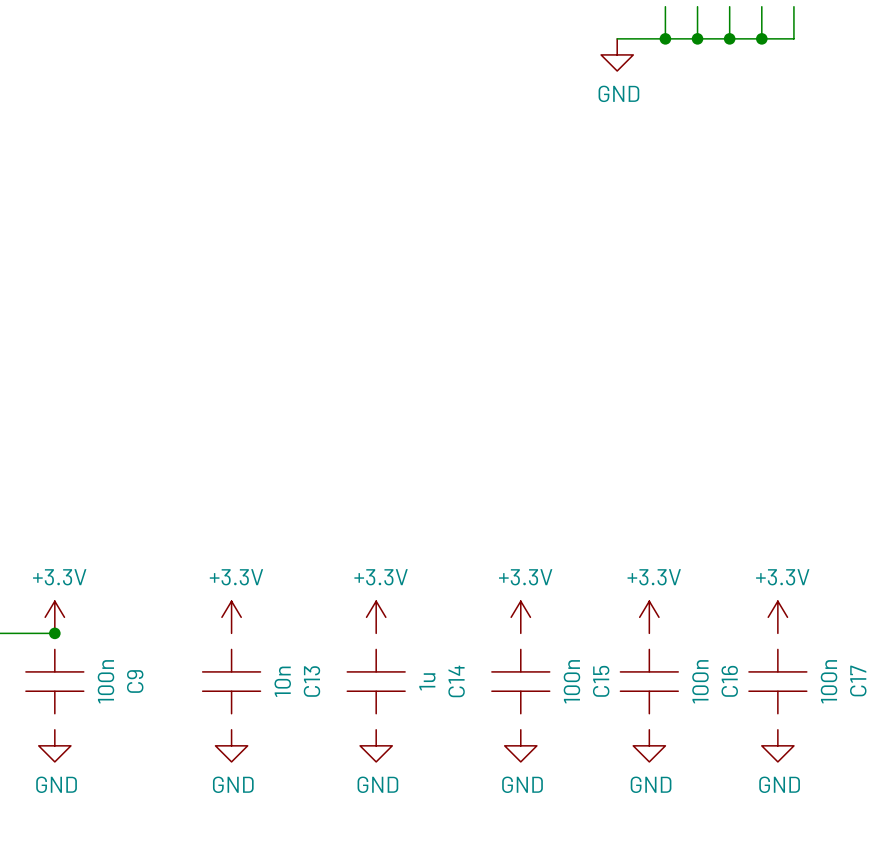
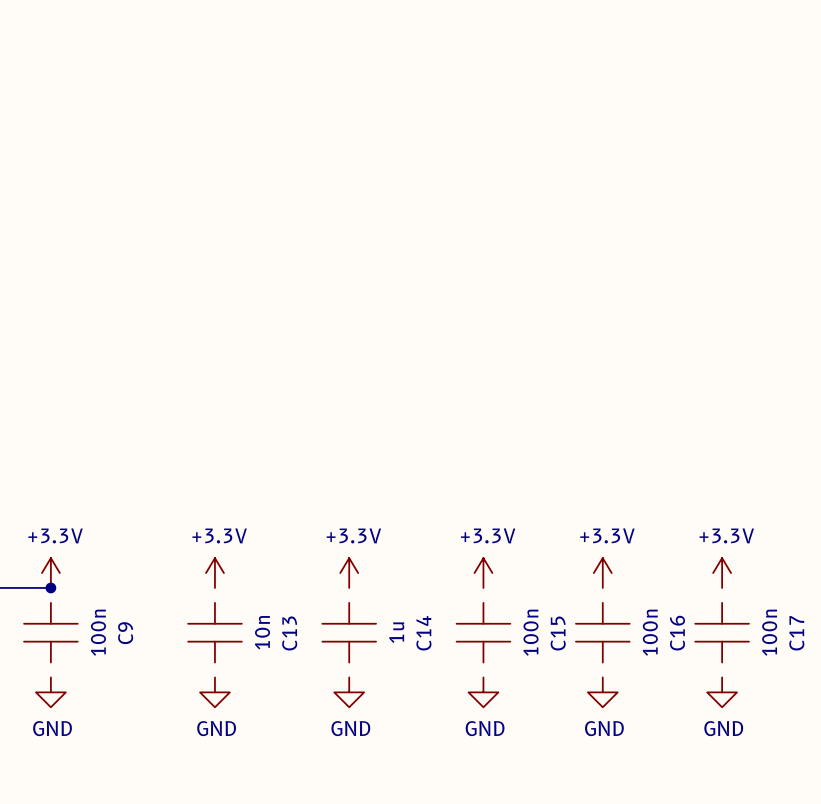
wire: (665, 6) (665, 38) -> none
wire: (697, 6) (697, 38) -> none
wire: (729, 6) (729, 38) -> none
wire: (761, 6) (761, 38) -> none
wire: (793, 6) (793, 38) (617, 38) -> none
junction: (665, 38) -> none
junction: (697, 38) -> none
junction: (729, 38) -> none
junction: (761, 38) -> none
power symbol: GND (617, 54) -> none

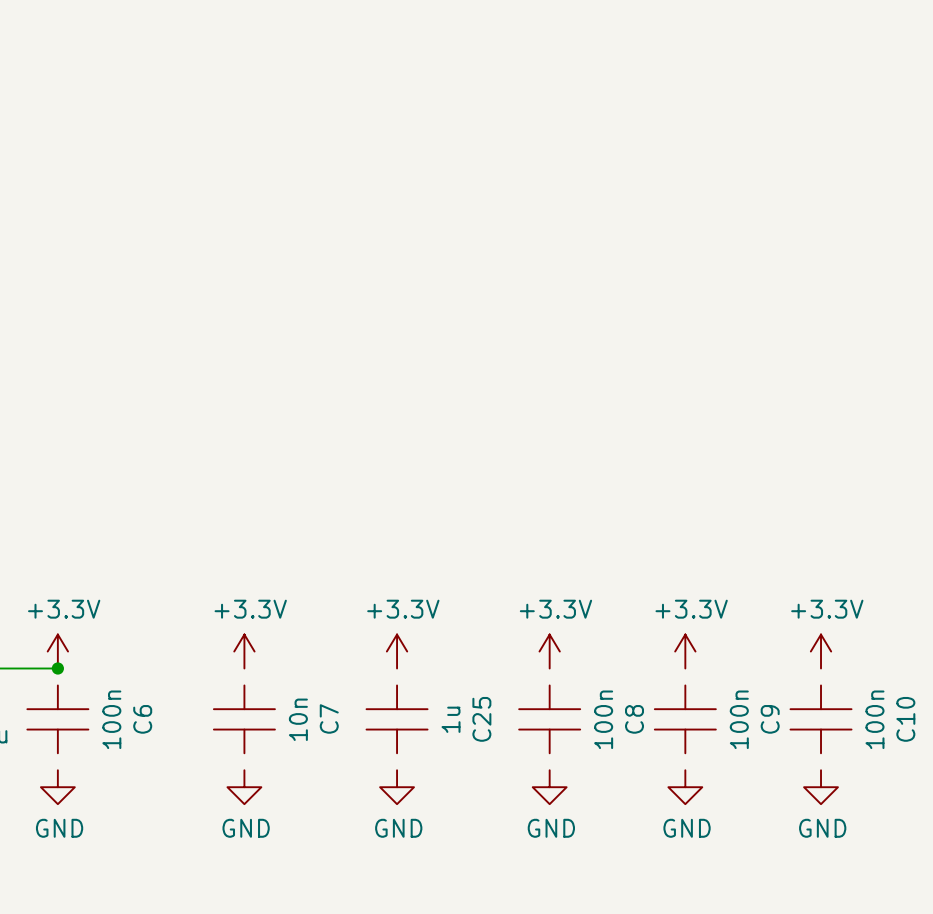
C9 name: C9 (125, 633) -> C6 (142, 719)
C13 name: C13 (289, 633) -> C7 (329, 718)
C14 name: C14 (423, 633) -> C25 (481, 719)
C15 name: C15 (558, 633) -> C8 (634, 719)
C16 name: C16 (677, 633) -> C9 (770, 719)
C17 name: C17 (796, 633) -> C10 (905, 719)

